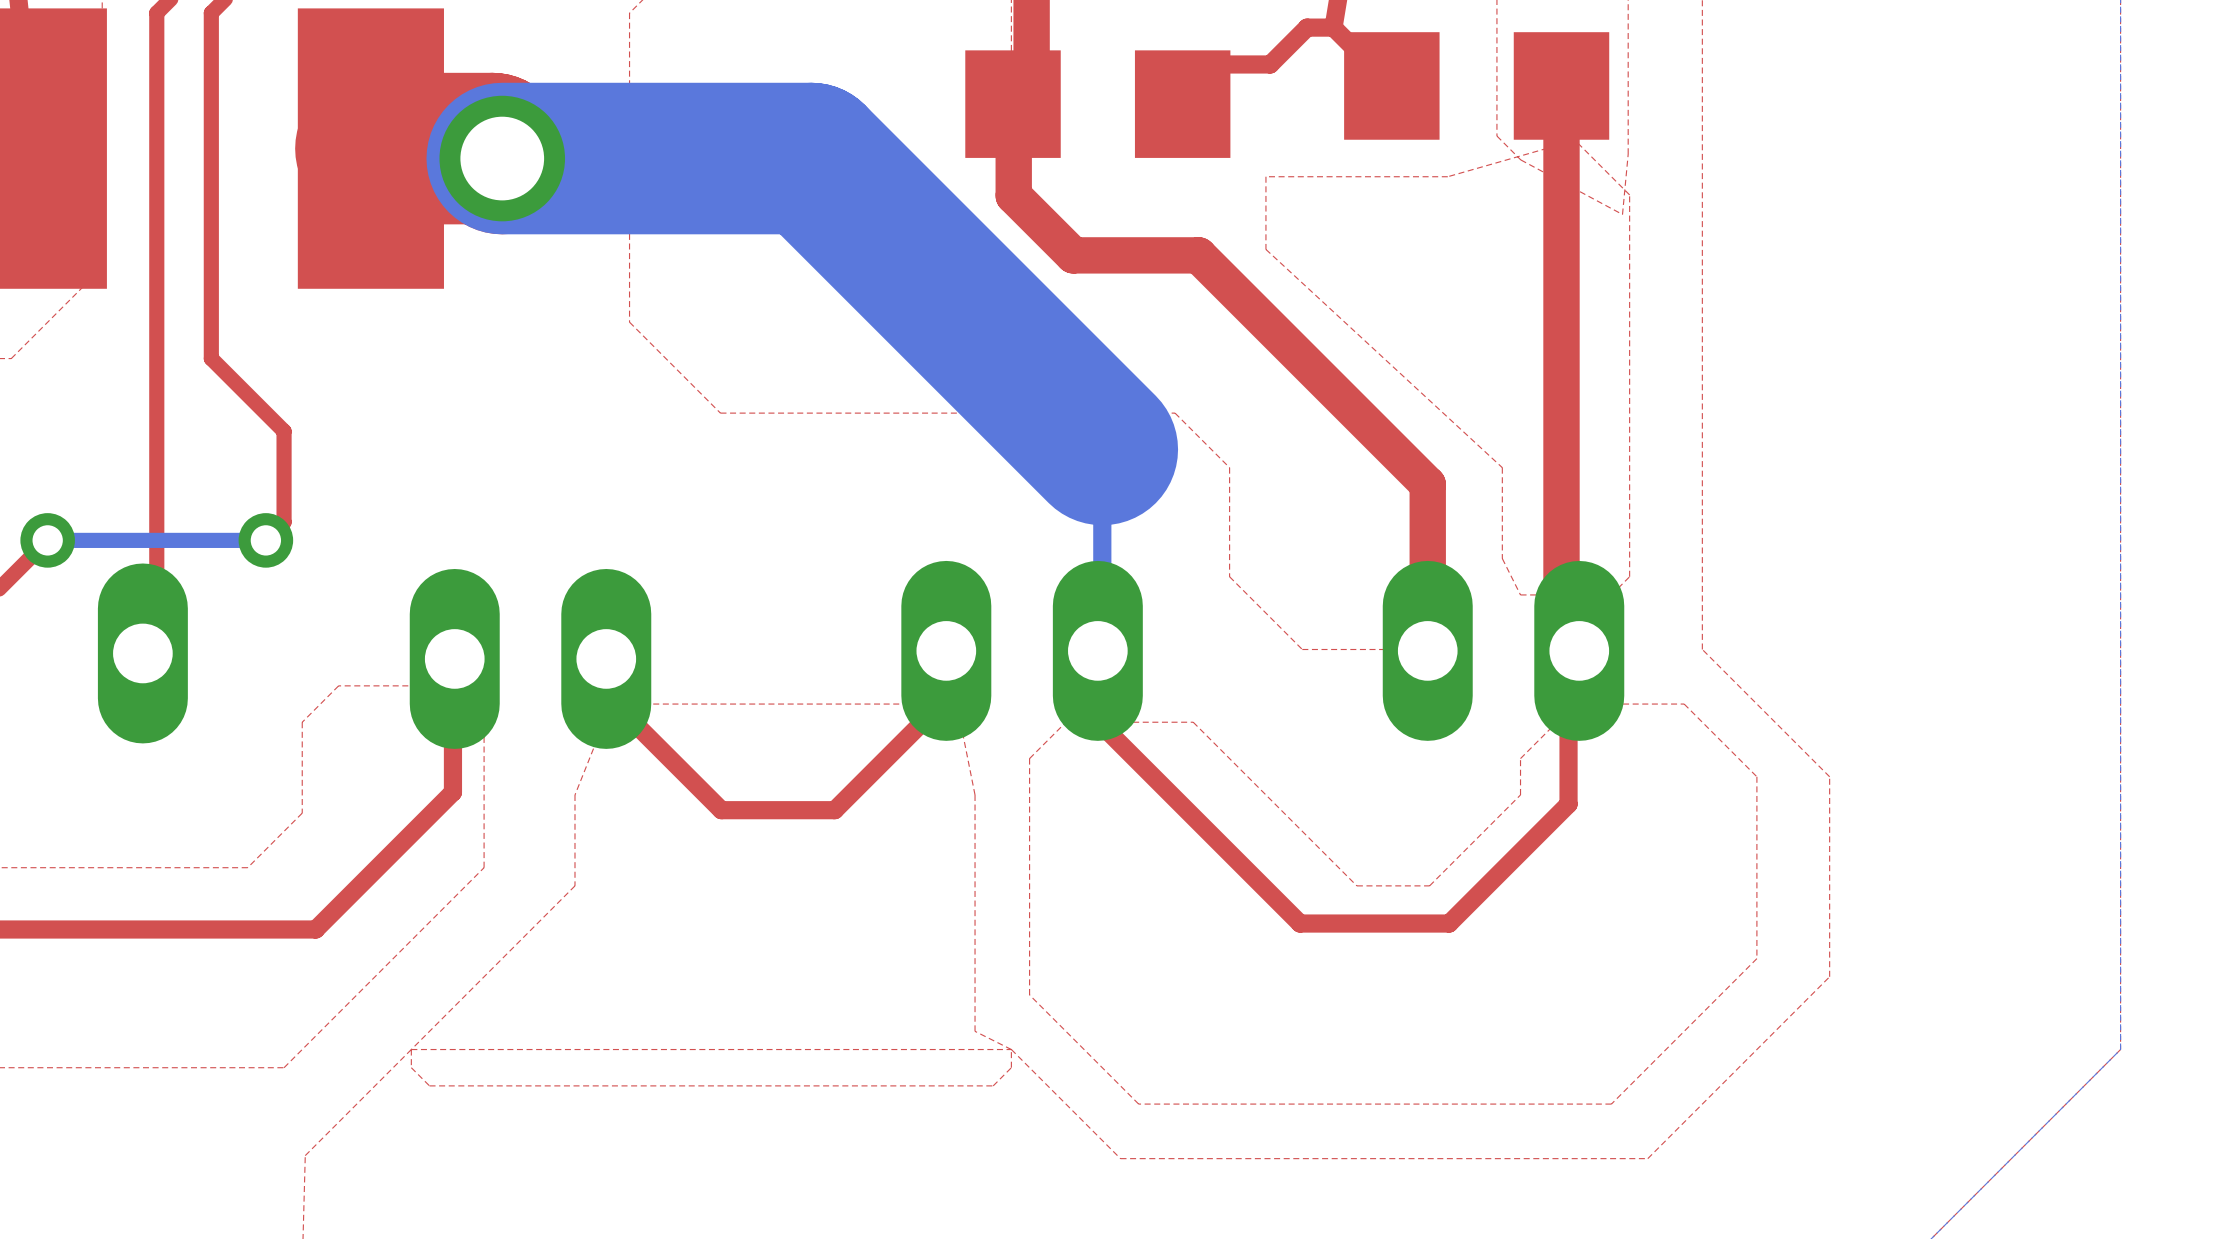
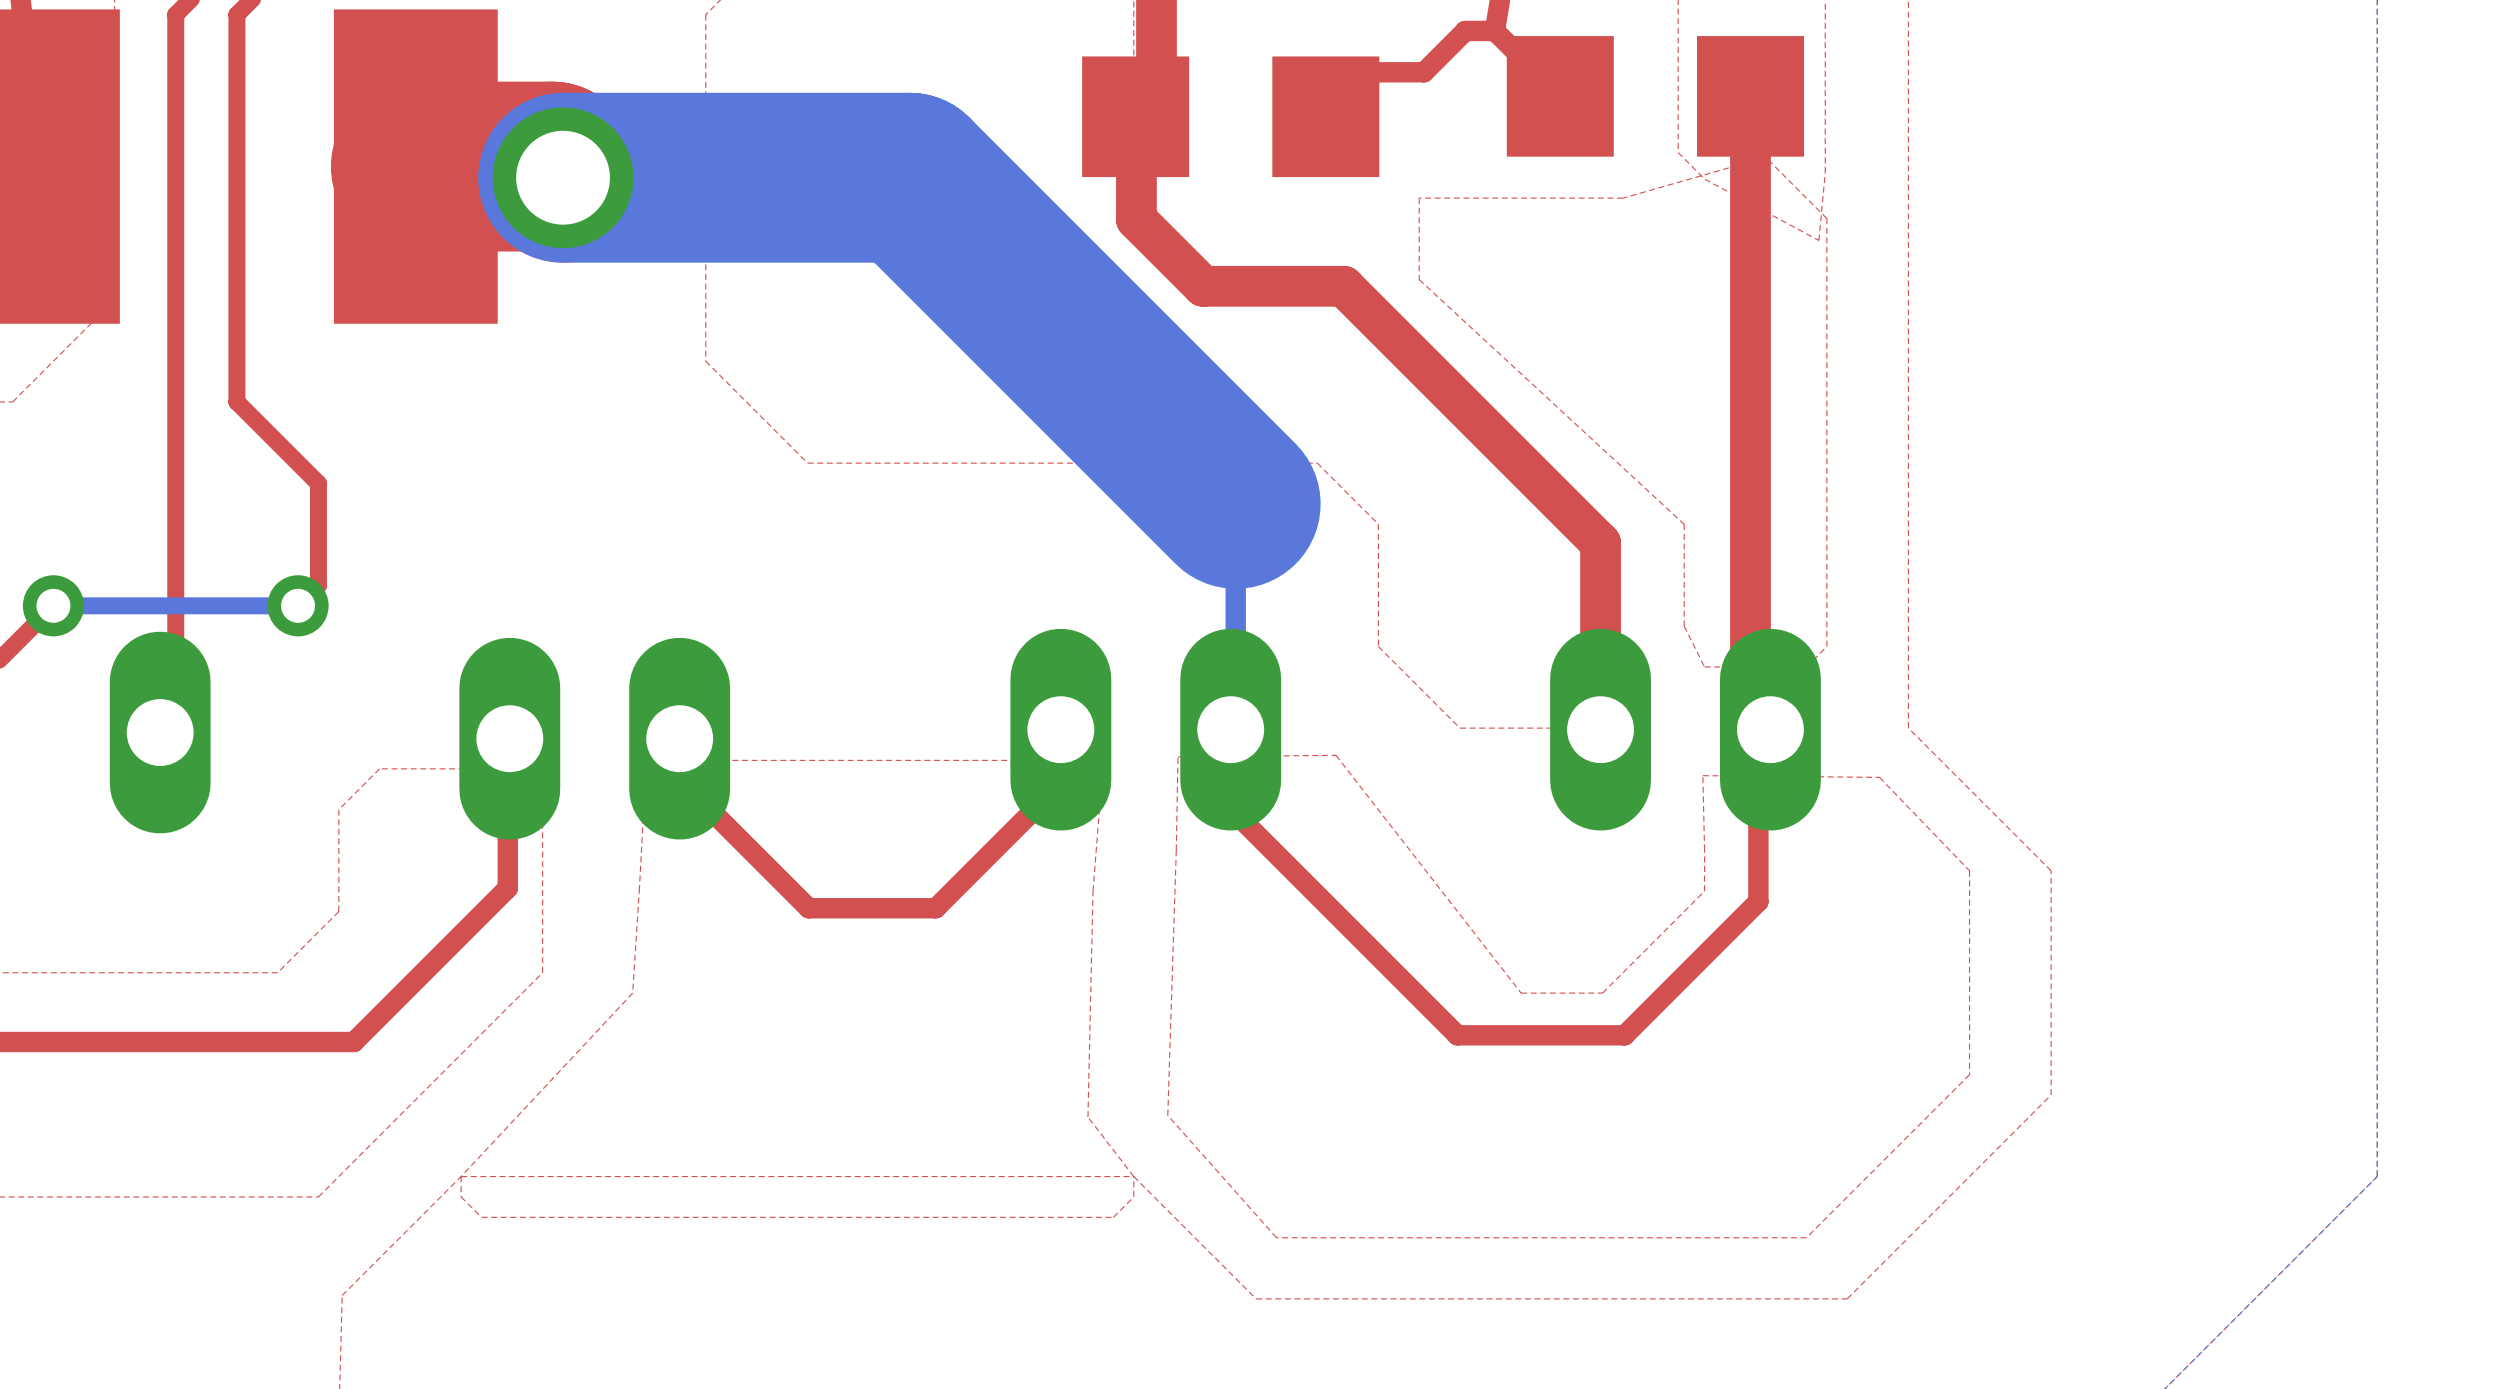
top zone outline: (1520, 758) (1575, 704) (1684, 704) (1756, 776) -> (1704, 850) (1702, 775) (1879, 777) (1969, 870)
top zone outline: (1356, 885) (1193, 722) (1065, 722) (1029, 758) (1029, 994) (1138, 1104) -> (1521, 993) (1335, 755) (1177, 756) (1167, 1115) (1276, 1237)
top zone outline: (1011, 1049) (975, 1031) (975, 794) (956, 704) (611, 704) (574, 794) (574, 885) (411, 1049) -> (1133, 1176) (1087, 1117) (1093, 891) (1103, 760) (646, 760) (632, 993) (461, 1176)

